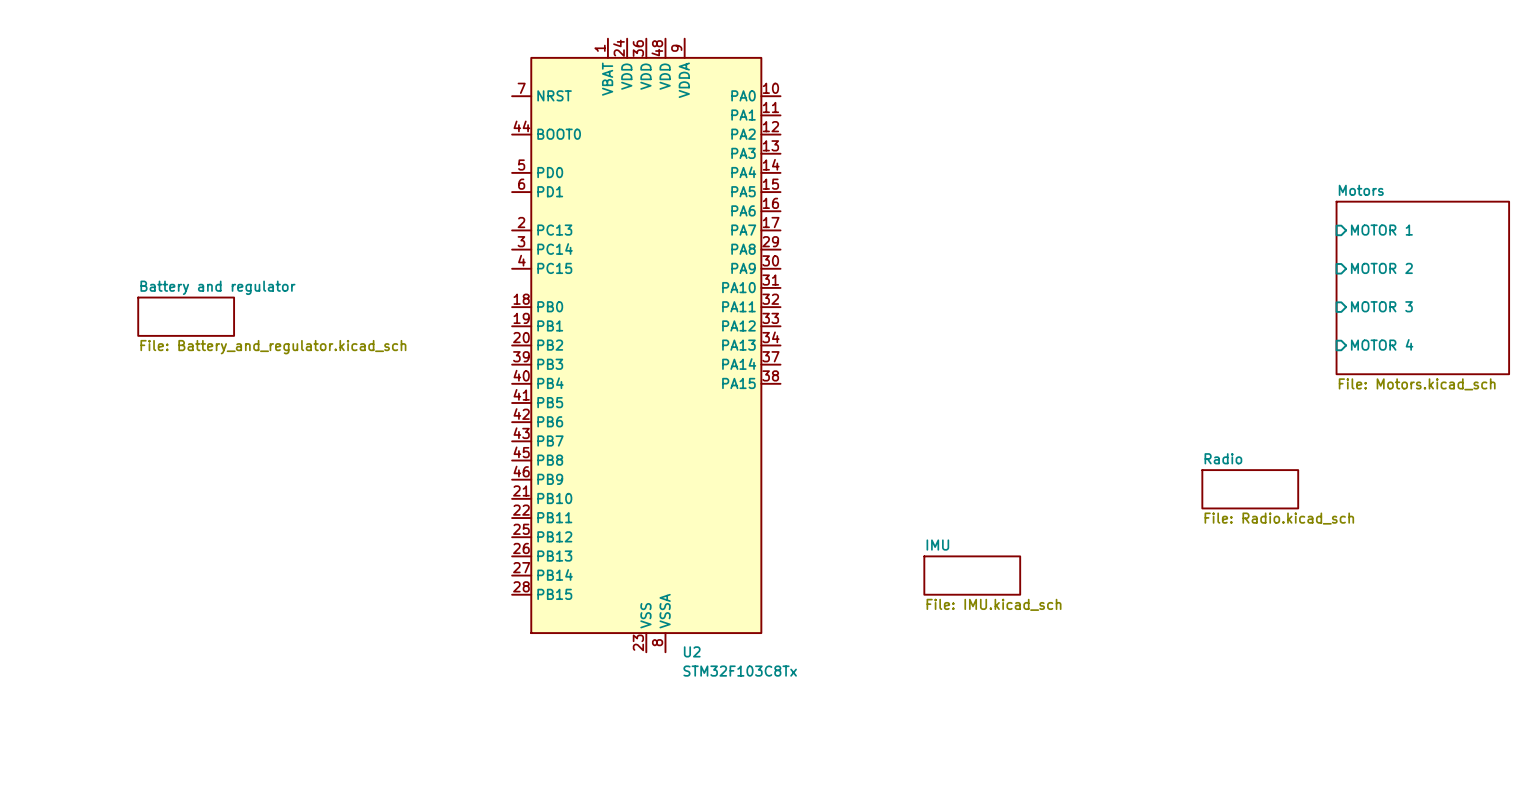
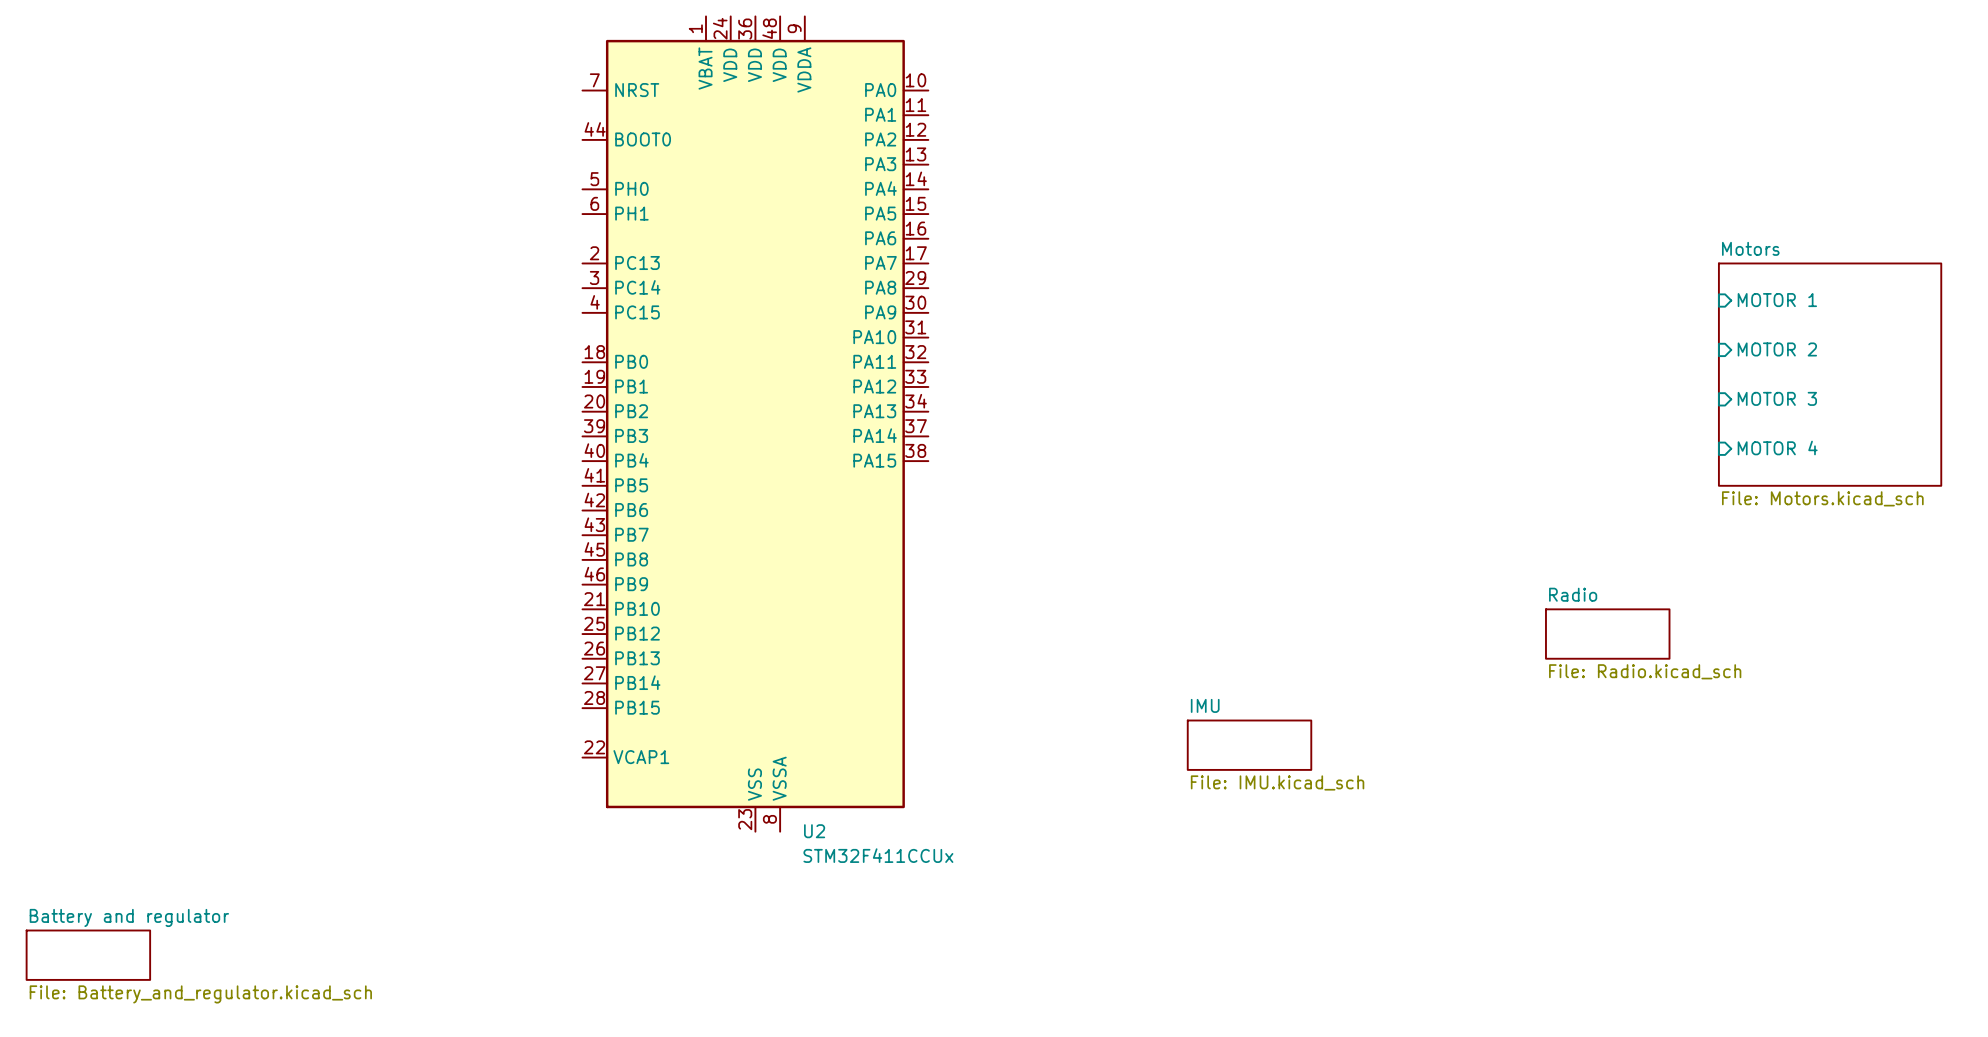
U2 symbol: [512, 38, 781, 653] -> [582, 16, 929, 832]
sheet Battery and regulator: File: Battery_and_regulator.kicad_sch (186, 316) -> none
U2 value: STM32F103C8Tx (740, 671) -> STM32F411CCUx (878, 855)
sheet Battery and regulator: none -> File: Battery_and_regulator.kicad_sch (88, 955)

